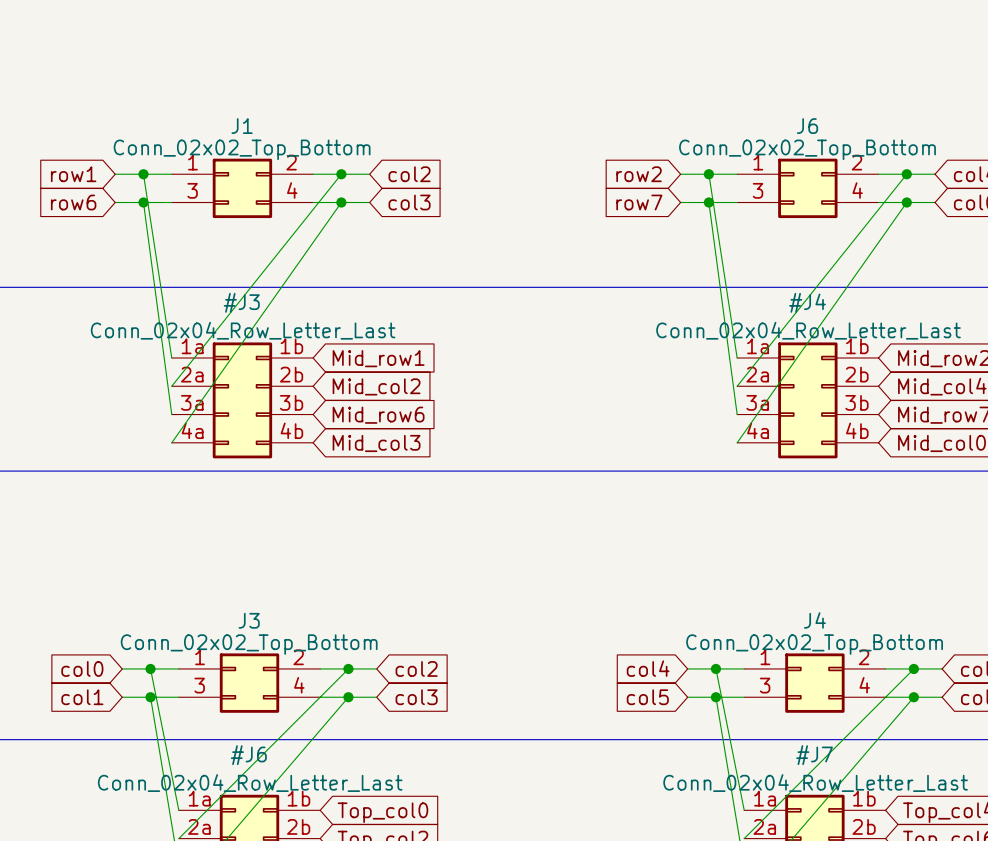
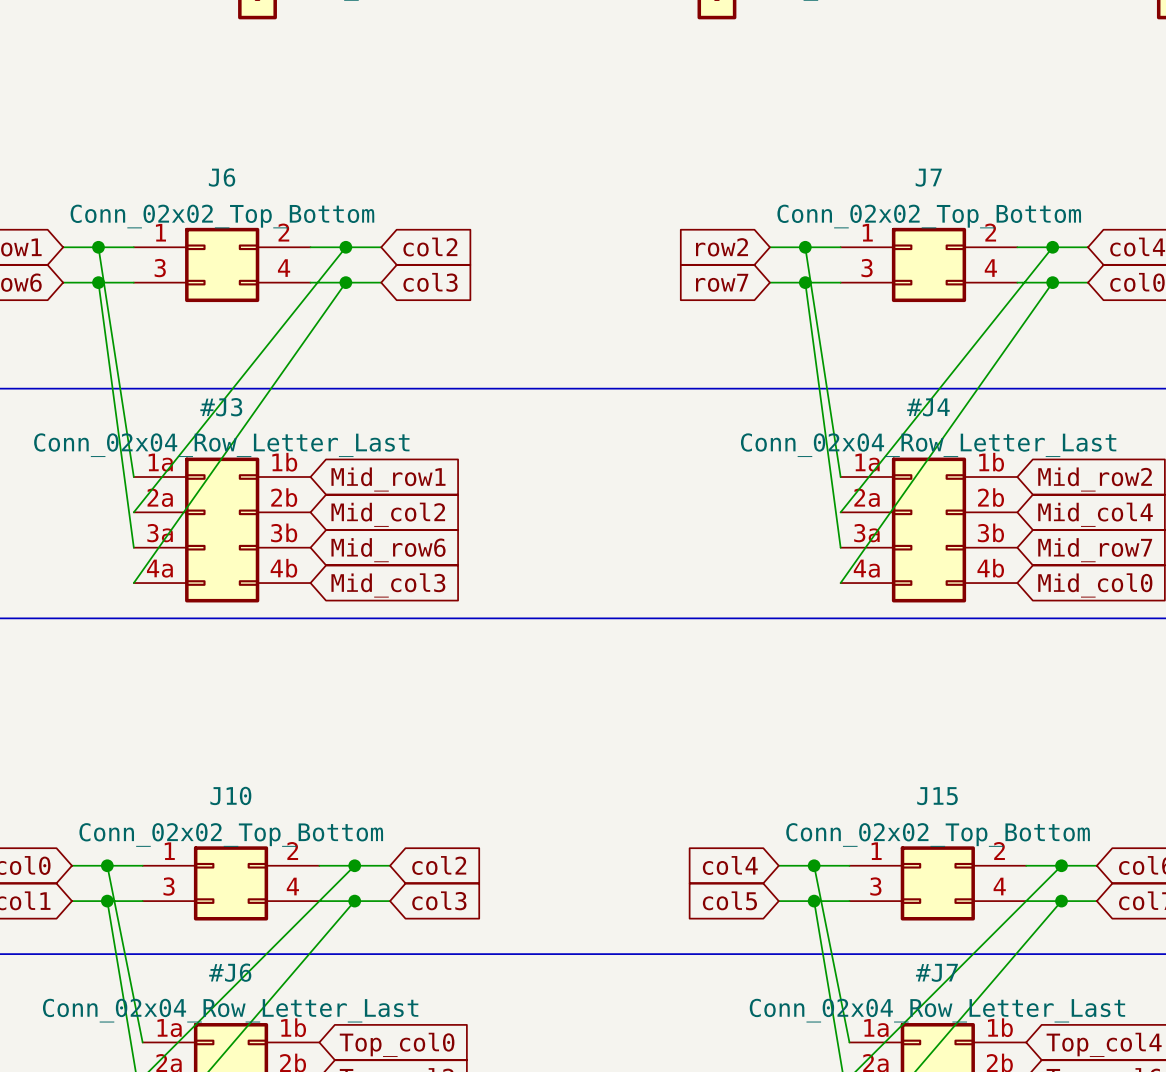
J1 name: J1 (242, 126) -> J6 (222, 177)
J6 name: J6 (807, 126) -> J7 (928, 177)
J3 name: J3 (249, 620) -> J10 (230, 795)
J4 name: J4 (814, 620) -> J15 (937, 796)

